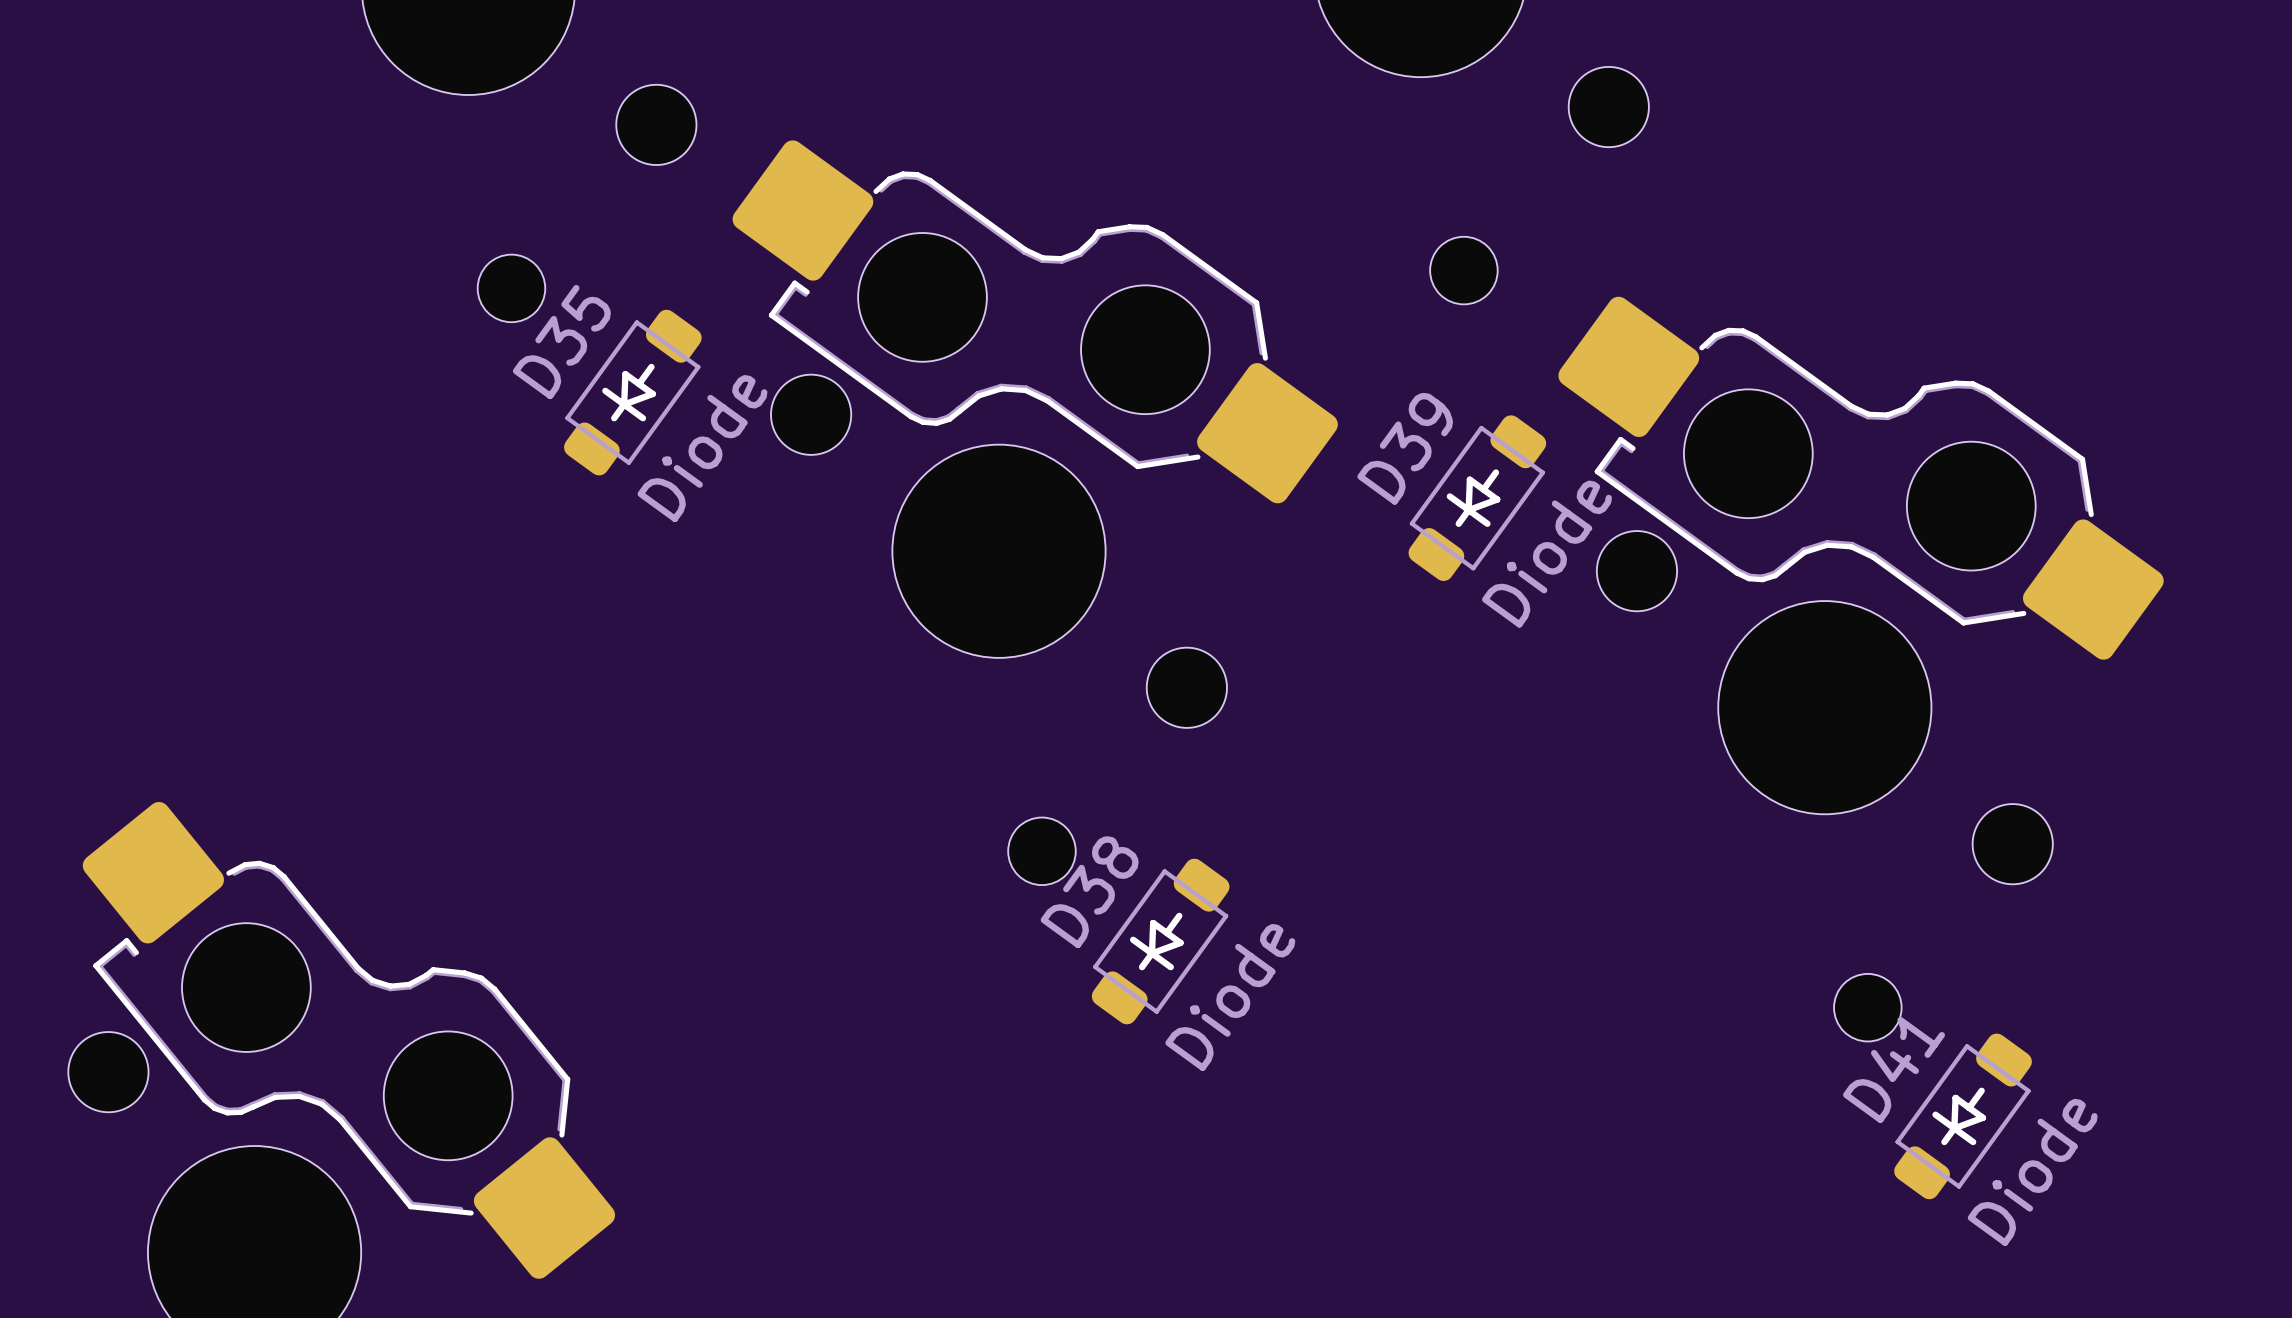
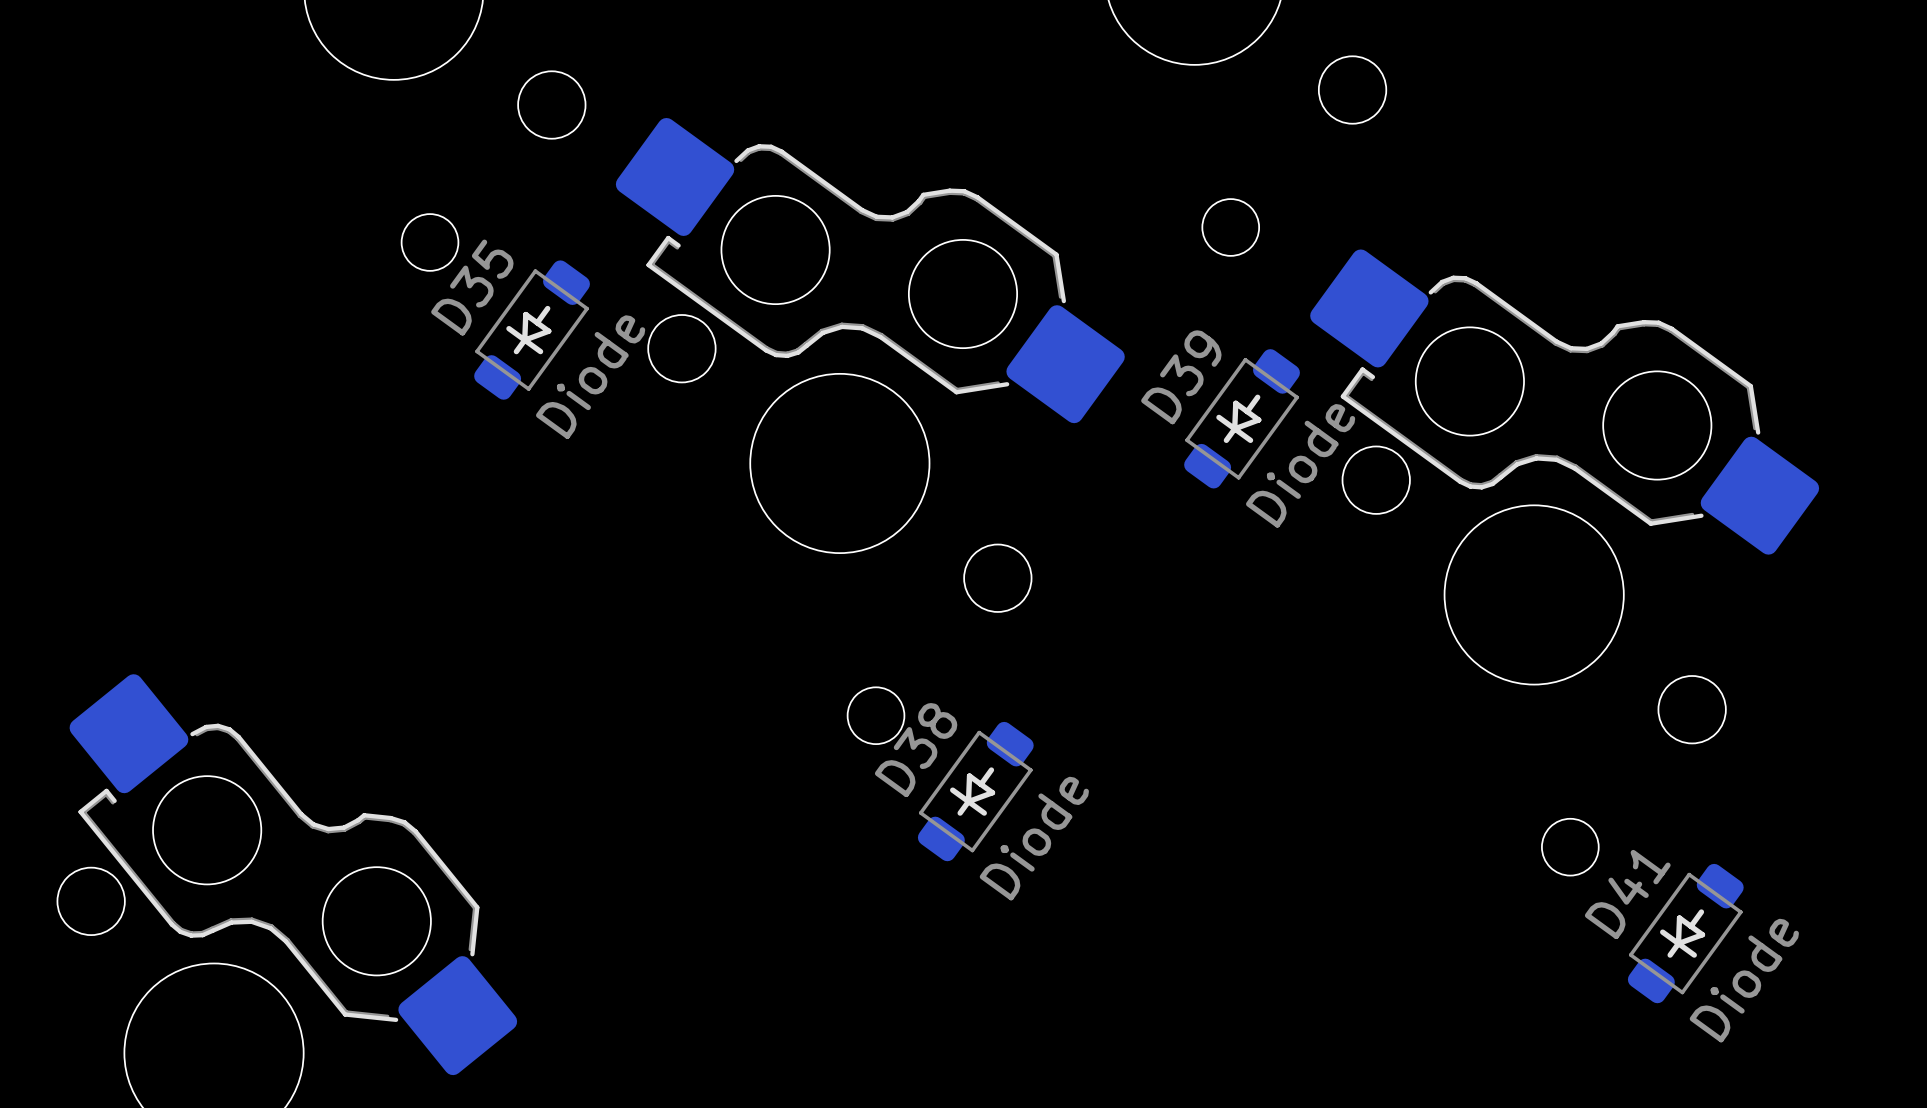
D41 position: (1963, 1116) -> (1685, 933)

